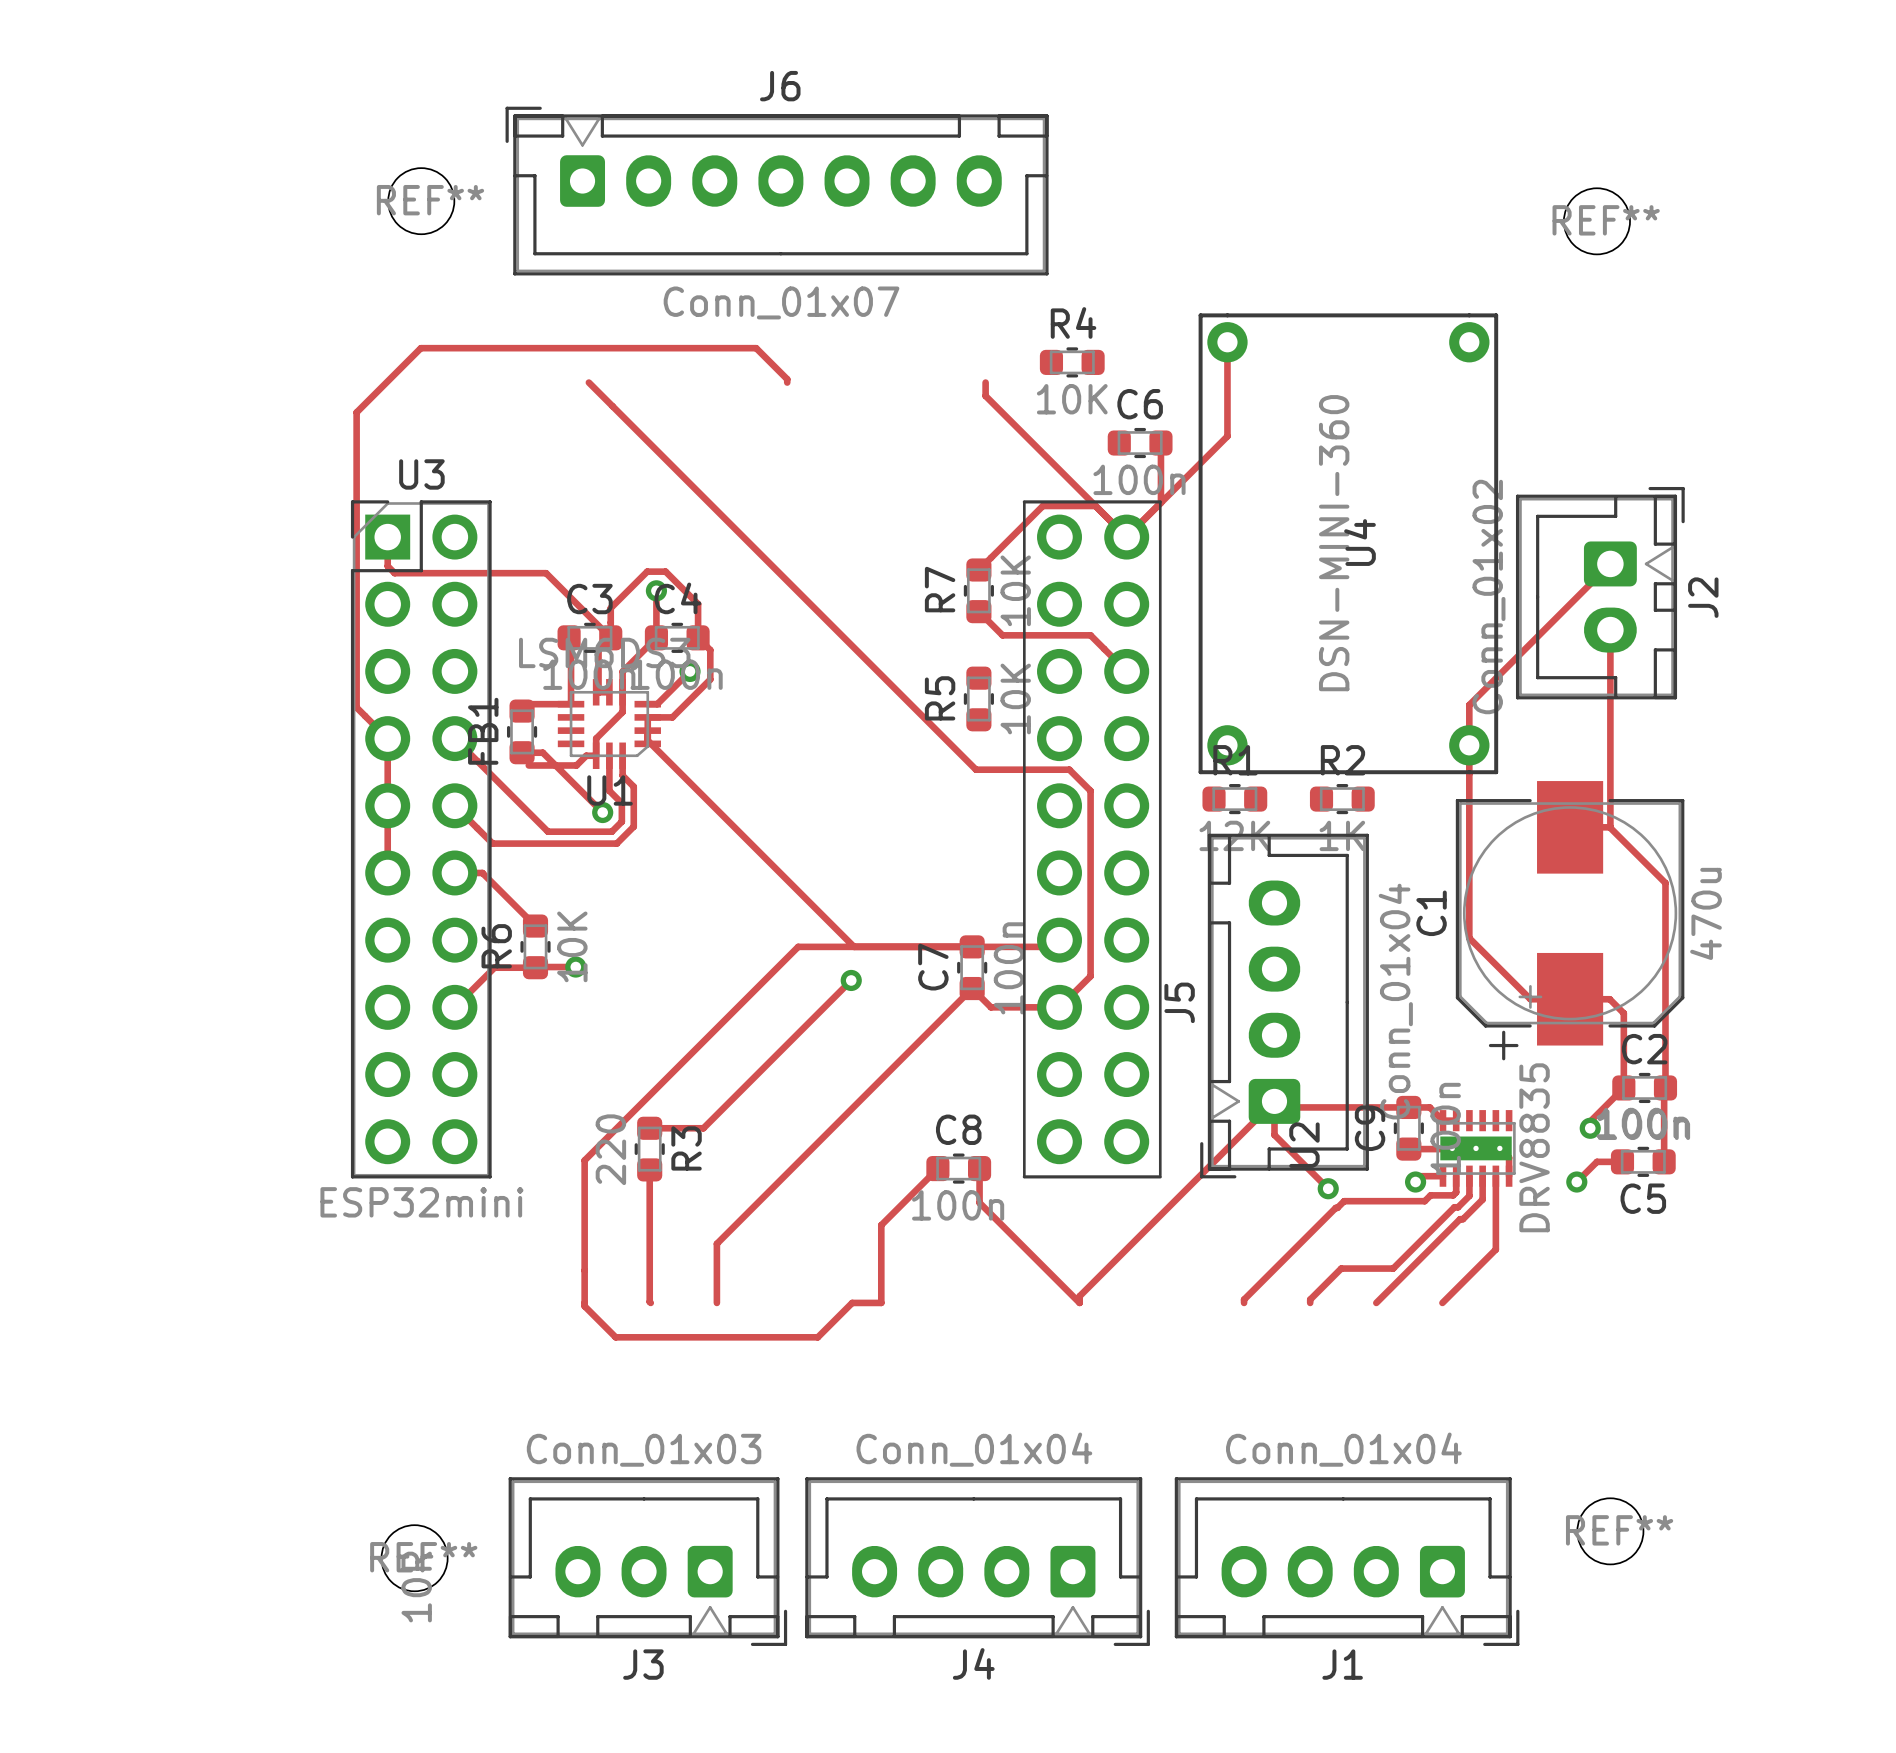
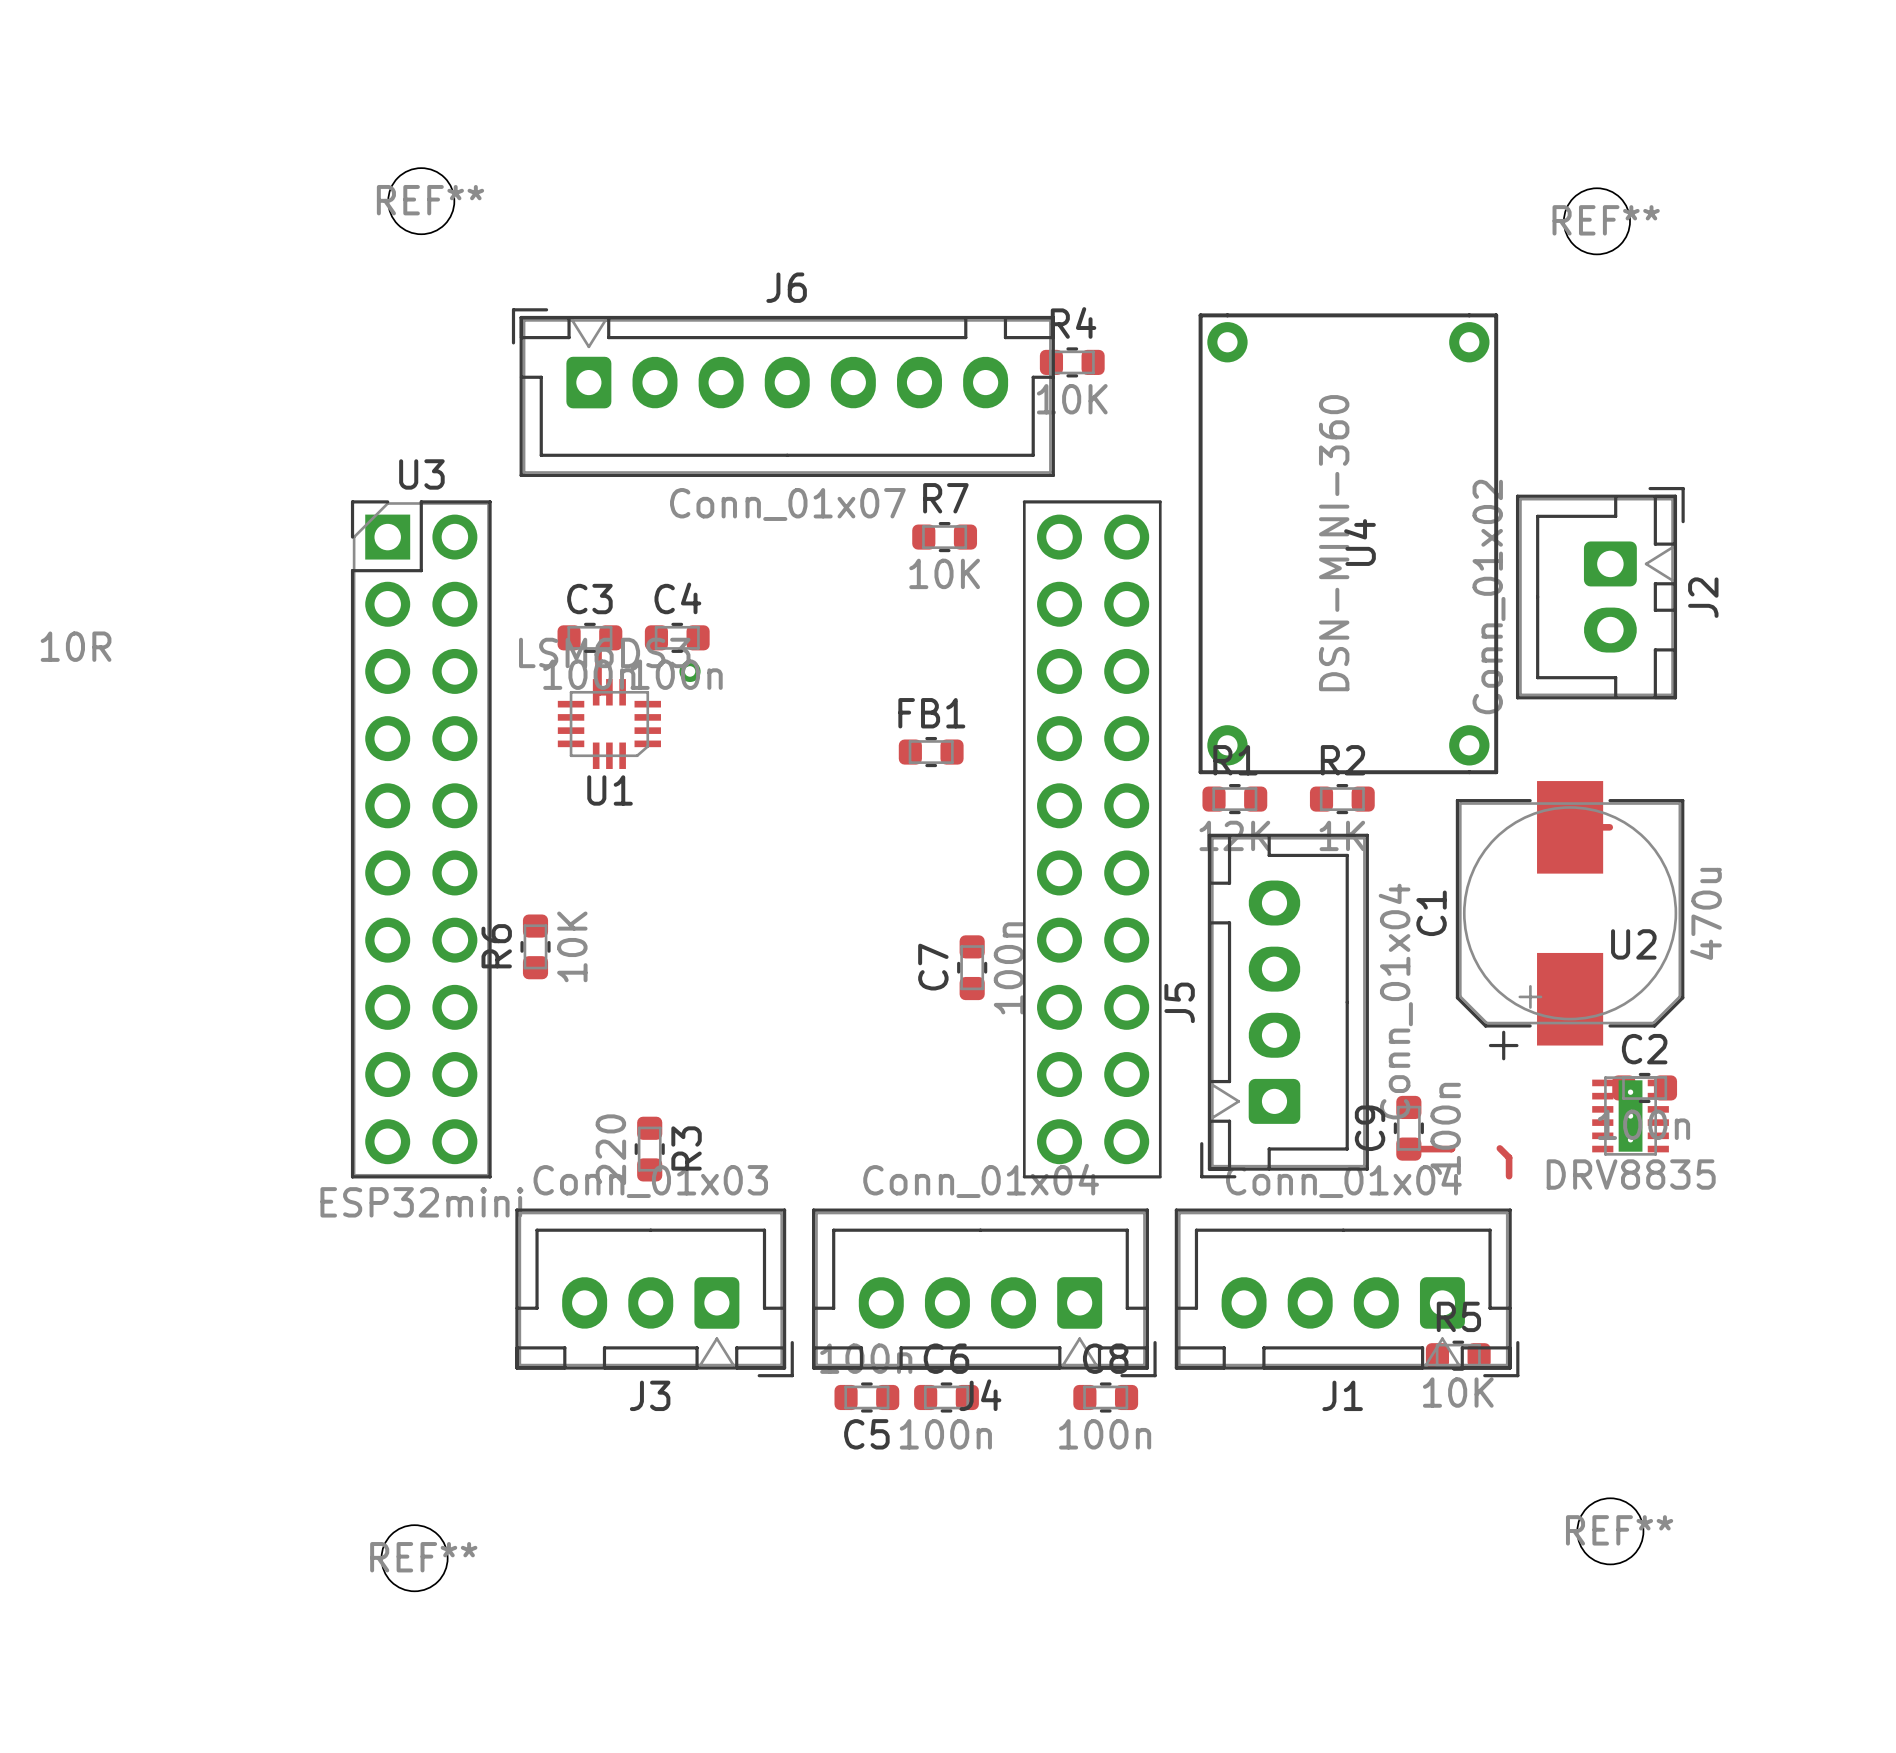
J6 position: (777, 191) -> (783, 392)
track: (1227, 342) (1227, 436) (1126, 537) (985, 395) (985, 382) -> none
track: (588, 382) (976, 769) (1069, 769) (1090, 790) (1090, 976) (1059, 1007) (990, 1007) (972, 988) (716, 1243) (716, 1302) -> none
track: (787, 382) (787, 379) (756, 348) (420, 348) (356, 412) (356, 707) (387, 738) (387, 872) -> none
C6 position: (1140, 443) -> (946, 1397)
track: (1160, 443) (1160, 502) -> none
track: (1095, 506) (1042, 506) (978, 569) -> none
track: (387, 537) (387, 566) (394, 573) (546, 573) (610, 637) (610, 608) (647, 571) (665, 571) (698, 604) (698, 637) (710, 650) (710, 679) (672, 717) (647, 717) (647, 743) -> none
track: (1610, 563) (1469, 705) (1469, 938) (1530, 999) (1609, 999) (1623, 1013) (1623, 1087) (1590, 1121) (1590, 1128) -> none
track: (656, 590) (656, 637) (622, 671) (622, 712) (596, 738) (596, 755) (586, 755) (576, 765) (528, 765) -> none
via: (656, 590) -> none
R7 rotation: 0° (978, 590) -> 90° clockwise (944, 537)
R7 position: (978, 590) -> (944, 537)
track: (978, 611) (1002, 635) (1090, 635) (1126, 671) -> none
track: (1610, 630) (1609, 827) (1665, 883) (1664, 1161) -> none
track: (569, 637) (571, 639) (571, 704) (528, 704) (522, 711) -> none
track: (690, 671) (657, 704) (647, 704) -> none
R5 rotation: 0° (978, 698) -> 90° clockwise (1458, 1355)
R5 position: (978, 698) -> (1458, 1355)
FB1 rotation: 0° (522, 731) -> 90° clockwise (931, 752)
FB1 position: (522, 731) -> (931, 752)
track: (454, 738) (547, 831) (611, 831) (621, 821) (621, 803) (609, 790) (609, 755) -> none
track: (647, 740) (854, 946) -> none
track: (522, 752) (542, 752) (602, 812) -> none
track: (622, 755) (622, 775) (633, 786) (633, 826) (616, 843) (492, 843) (454, 805) -> none
via: (602, 812) -> none
track: (454, 872) (482, 872) (535, 926) -> none
track: (1059, 940) (1052, 946) (798, 946) (584, 1160) (584, 1306) (615, 1337) (817, 1337) (852, 1302) (881, 1302) (881, 1225) (937, 1168) -> none
track: (575, 967) (494, 967) (454, 1007) -> none
via: (575, 967) -> none
track: (851, 980) (703, 1128) (649, 1128) -> none
via: (851, 980) -> none
track: (1274, 1101) (1079, 1296) (1079, 1302) (979, 1202) (979, 1168) -> none
track: (1274, 1101) (1280, 1107) (1429, 1107) (1442, 1120) (1456, 1120) -> none
track: (1274, 1101) (1274, 1134) (1328, 1188) -> none
via: (1590, 1128) -> none
U2 rotation: 0° (1476, 1148) -> 90° clockwise (1630, 1115)
U2 position: (1476, 1148) -> (1630, 1115)
track: (1622, 1161) (1596, 1161) (1576, 1182) -> none
C5 position: (1643, 1161) -> (866, 1397)
C8 position: (958, 1168) -> (1105, 1397)
track: (649, 1169) (650, 1302) -> none
track: (1442, 1176) (1421, 1176) (1415, 1182) -> none
track: (1456, 1176) (1456, 1192) (1453, 1195) (1430, 1195) (1424, 1201) (1344, 1201) (1244, 1299) (1244, 1302) -> none
track: (1469, 1176) (1469, 1195) (1458, 1207) (1454, 1207) (1393, 1268) (1341, 1268) (1310, 1299) (1310, 1302) -> none
track: (1482, 1176) (1482, 1199) (1463, 1219) (1460, 1219) (1376, 1302) -> none
track: (1495, 1176) (1495, 1249) (1442, 1302) -> none
via: (1415, 1182) -> none
via: (1576, 1182) -> none
via: (1328, 1188) -> none
J3 position: (647, 1561) -> (654, 1292)
J4 position: (977, 1561) -> (984, 1292)
J1 position: (1347, 1561) -> (1347, 1292)

